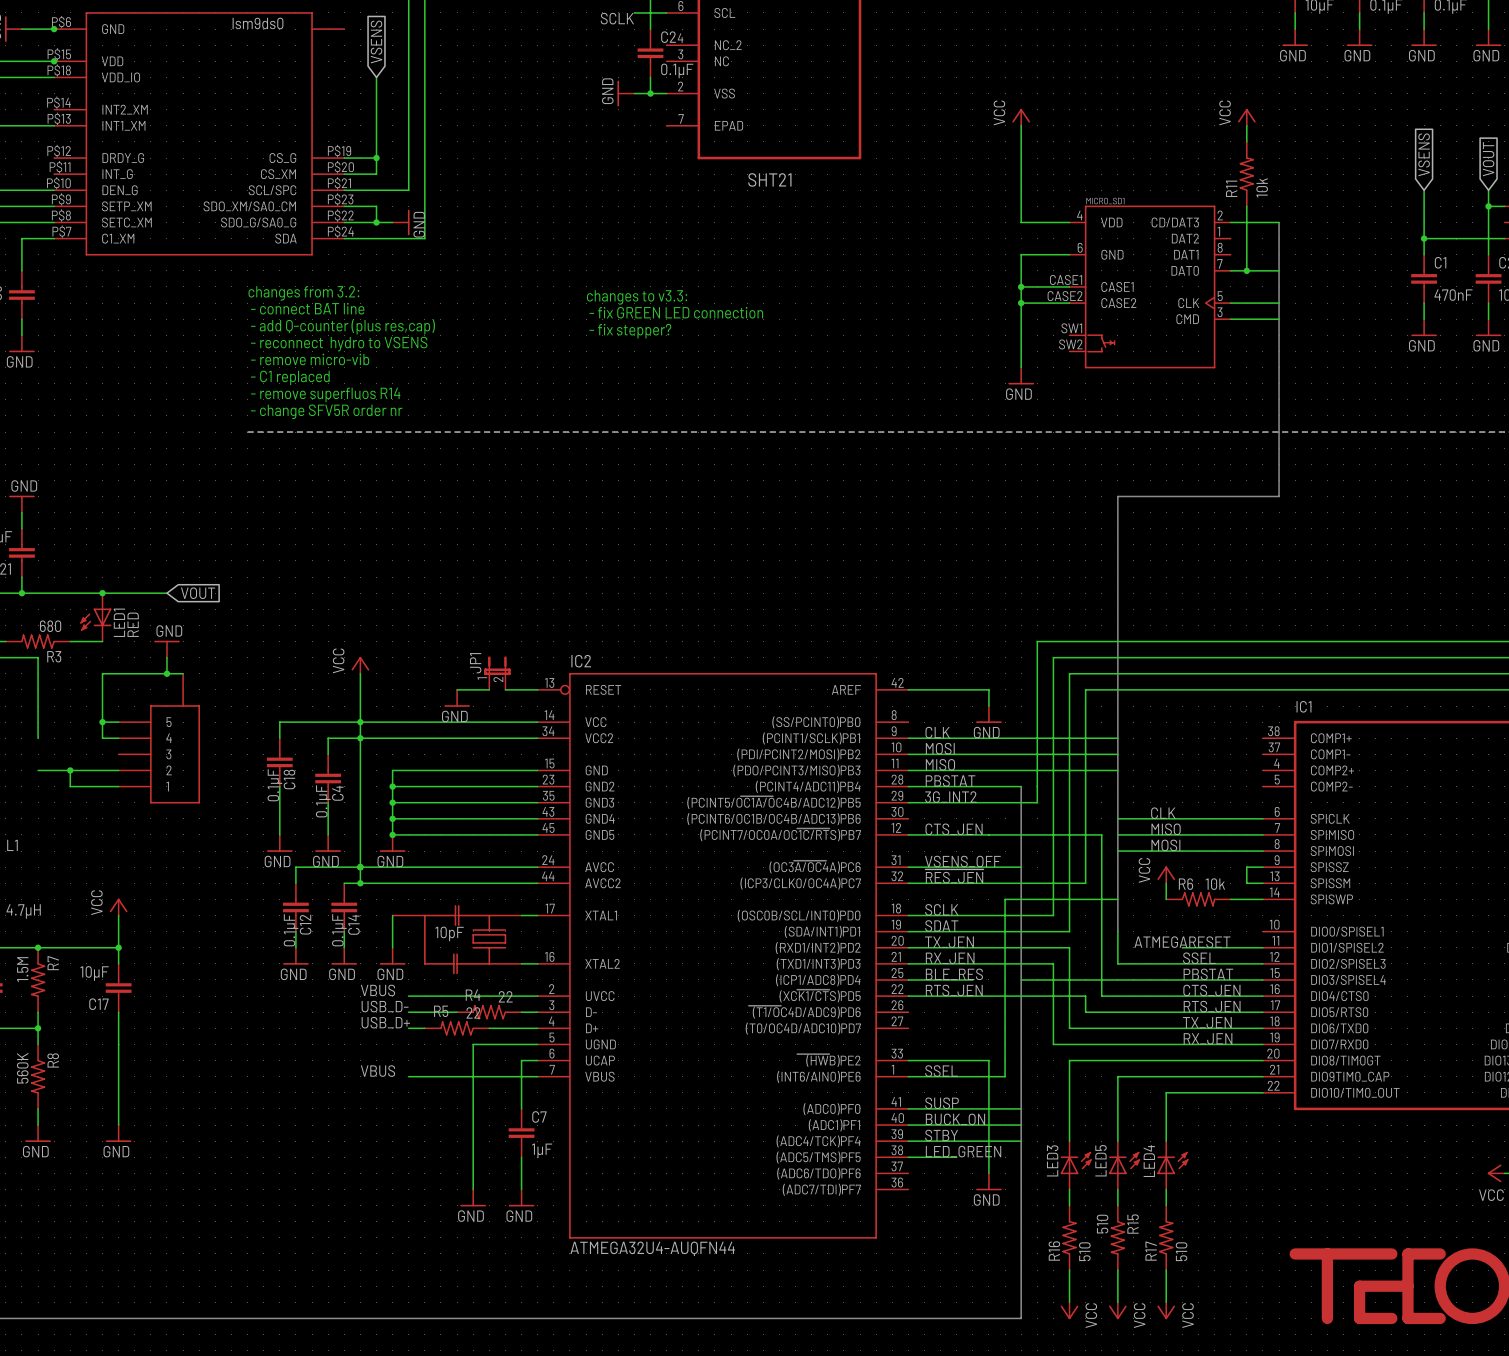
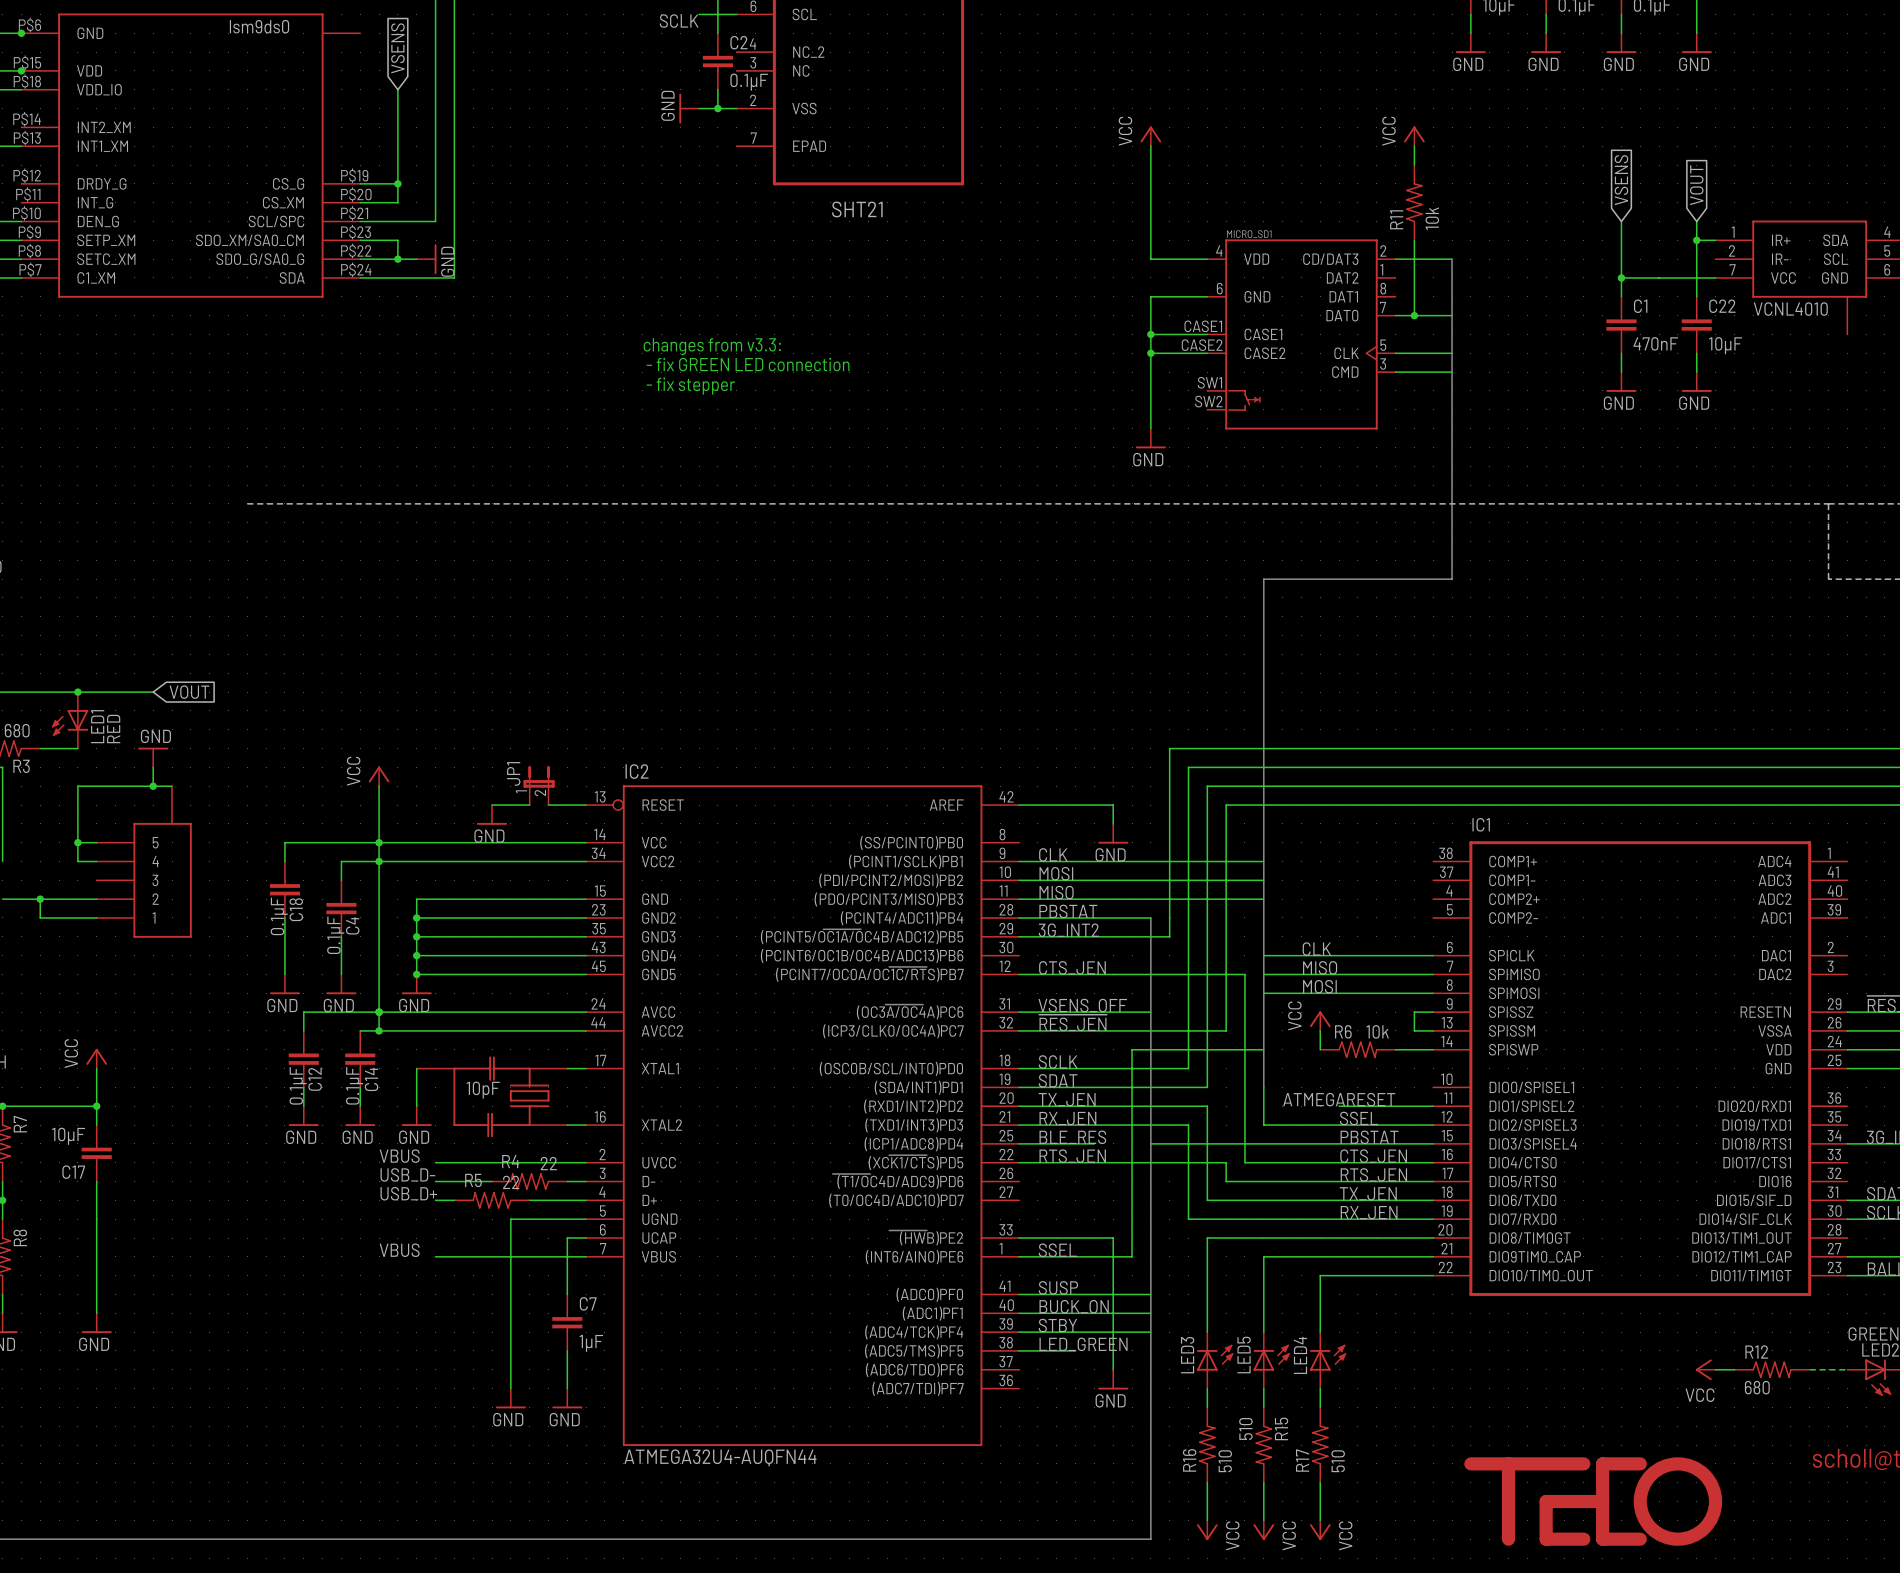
text: changes from 3.2: (303, 293) -> none
text: changes to v3.3: (637, 297) -> changes from v3.3: (712, 346)
text: - connect BAT line (307, 308) -> none
text: - add Q-counter (plus res,cap) (342, 326) -> none
text: - fix stepper? (630, 331) -> - fix stepper (690, 386)
text: - reconnect hydro to VSENS (339, 344) -> none
text: - remove micro-vib (310, 359) -> none
text: - C1 replaced (290, 377) -> none
text: - remove superfluos R14 (325, 394) -> none
text: - change SFV5R order nr (326, 411) -> none

